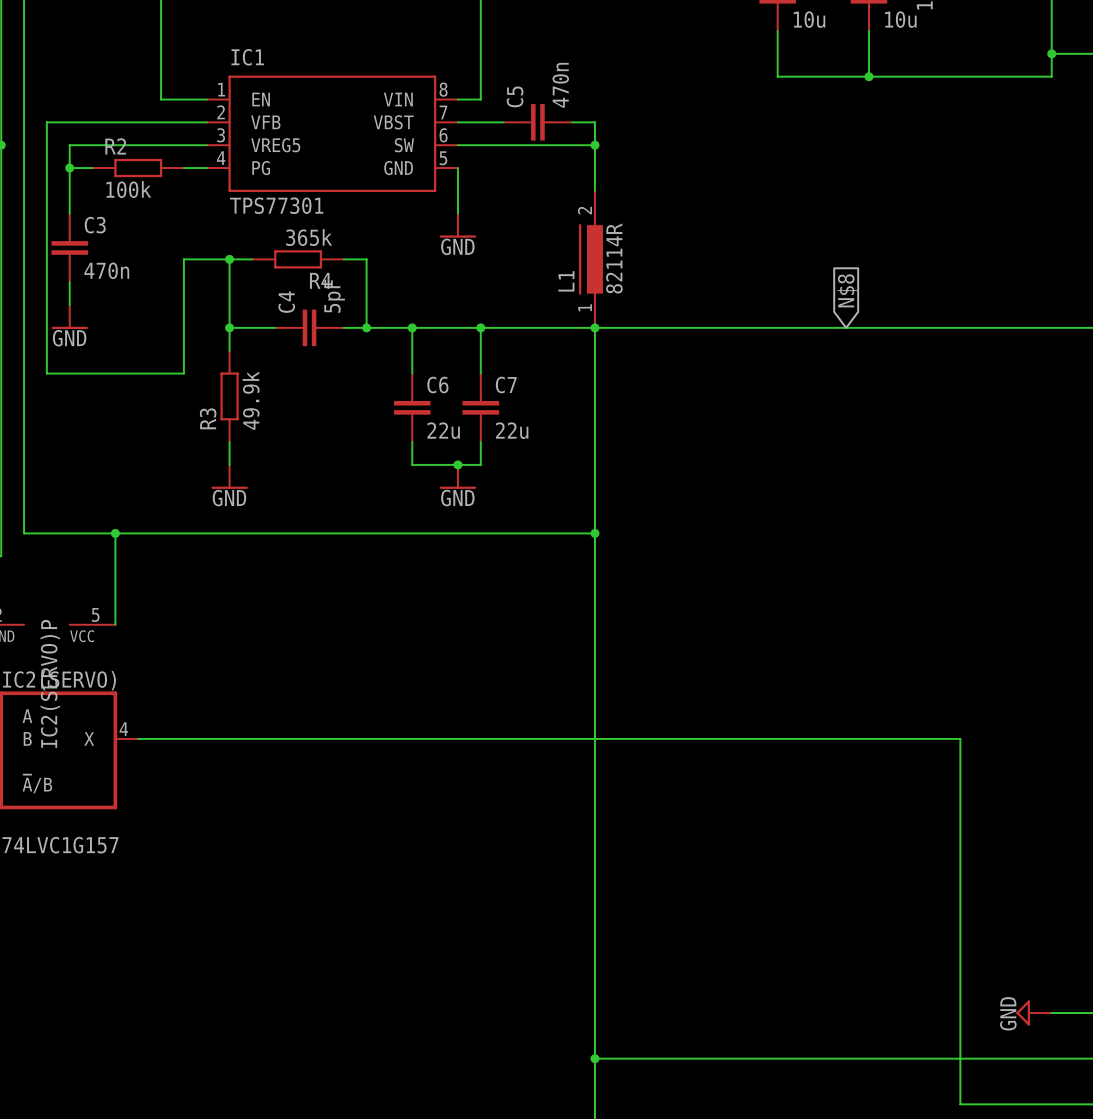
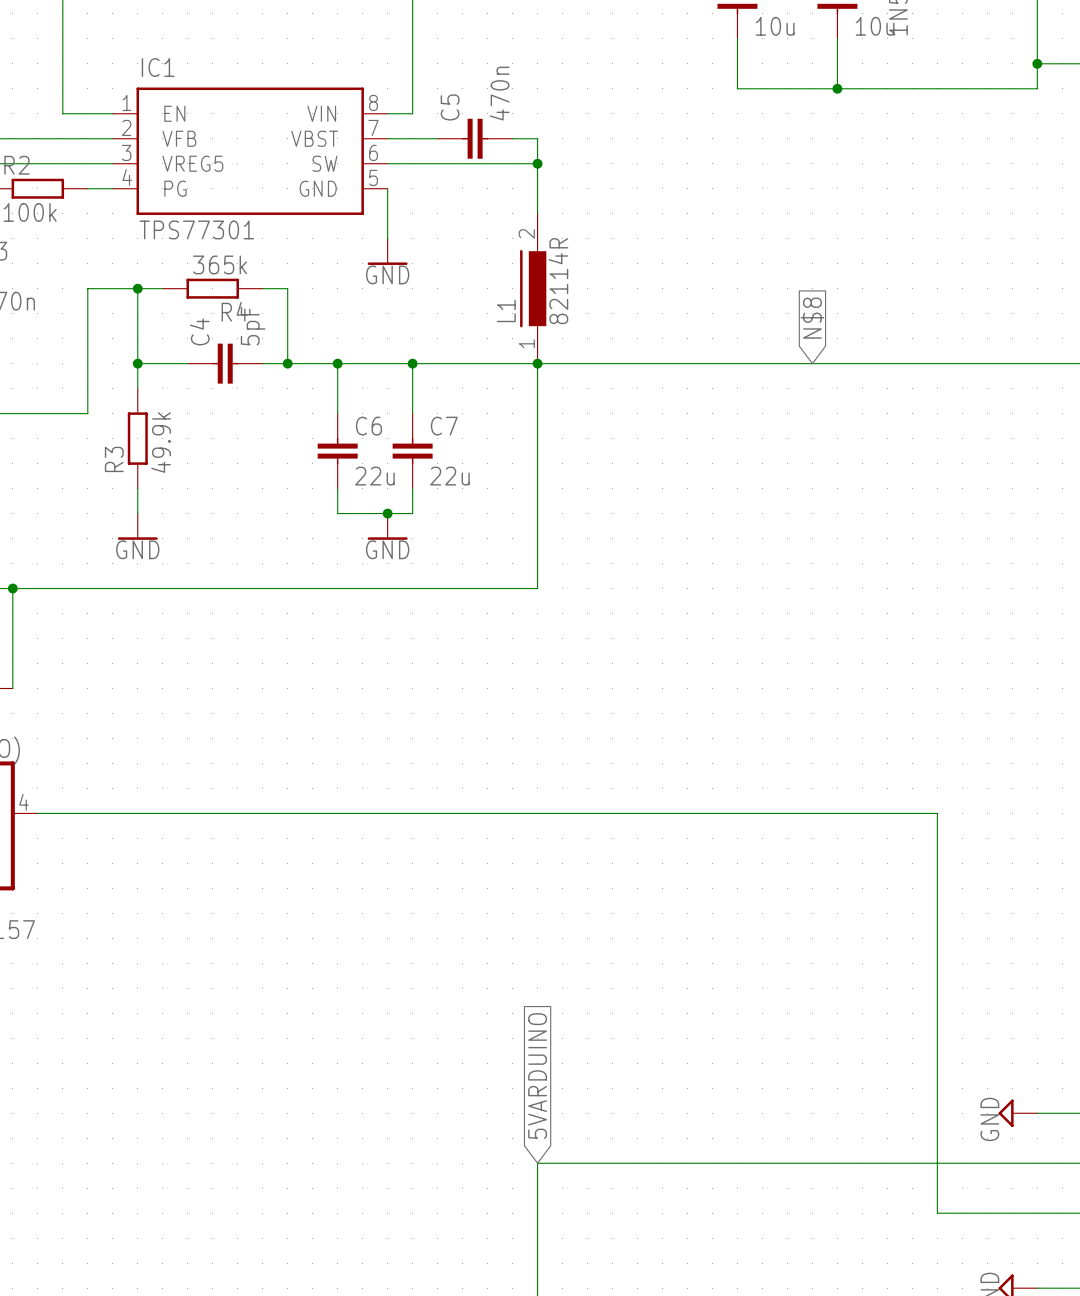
wire: (594, 533) (594, 1058) -> none
junction: (594, 533) -> none
global label: none -> 5VARDUINO (537, 1076)
junction: (594, 1058) -> none

